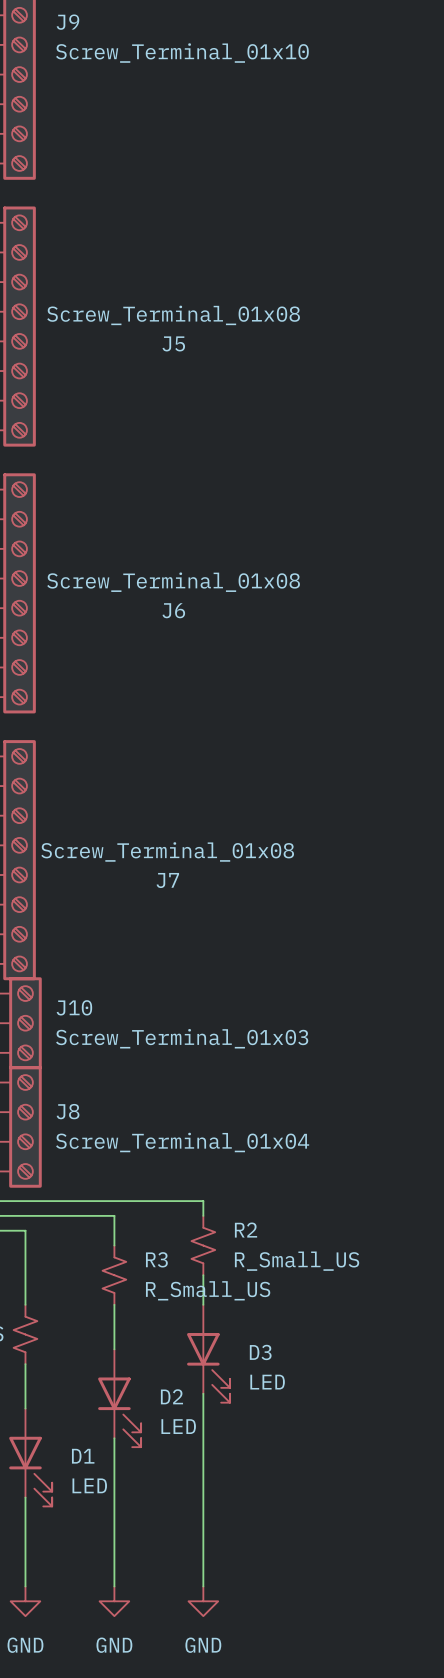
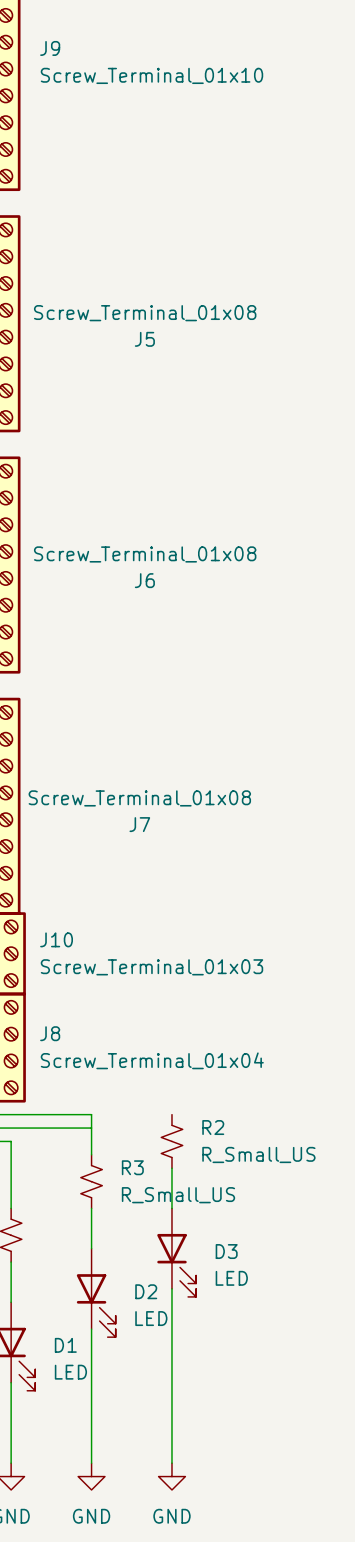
wire: (114, 1201) (203, 1201) (203, 1215) -> (91, 1114) (91, 1128)
R2 position: (203, 1245) -> (171, 1141)

